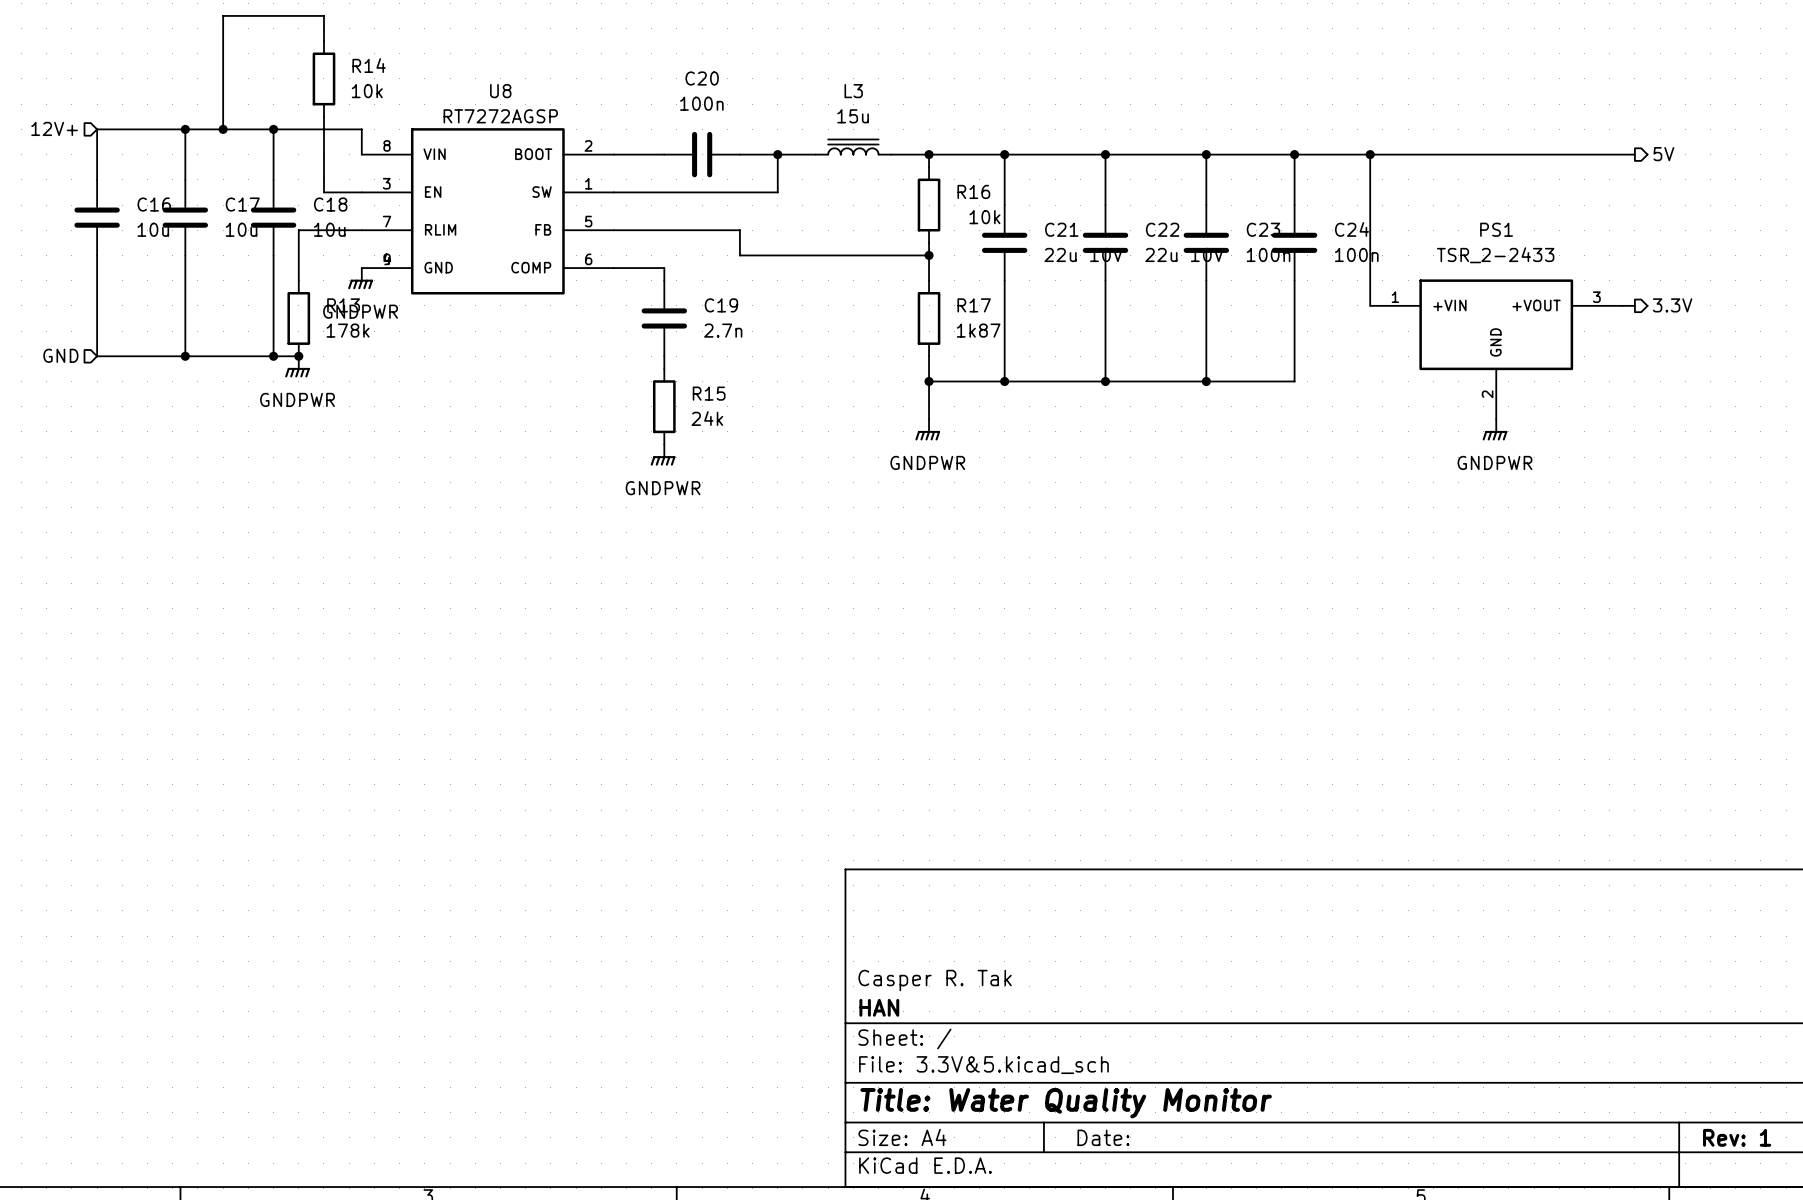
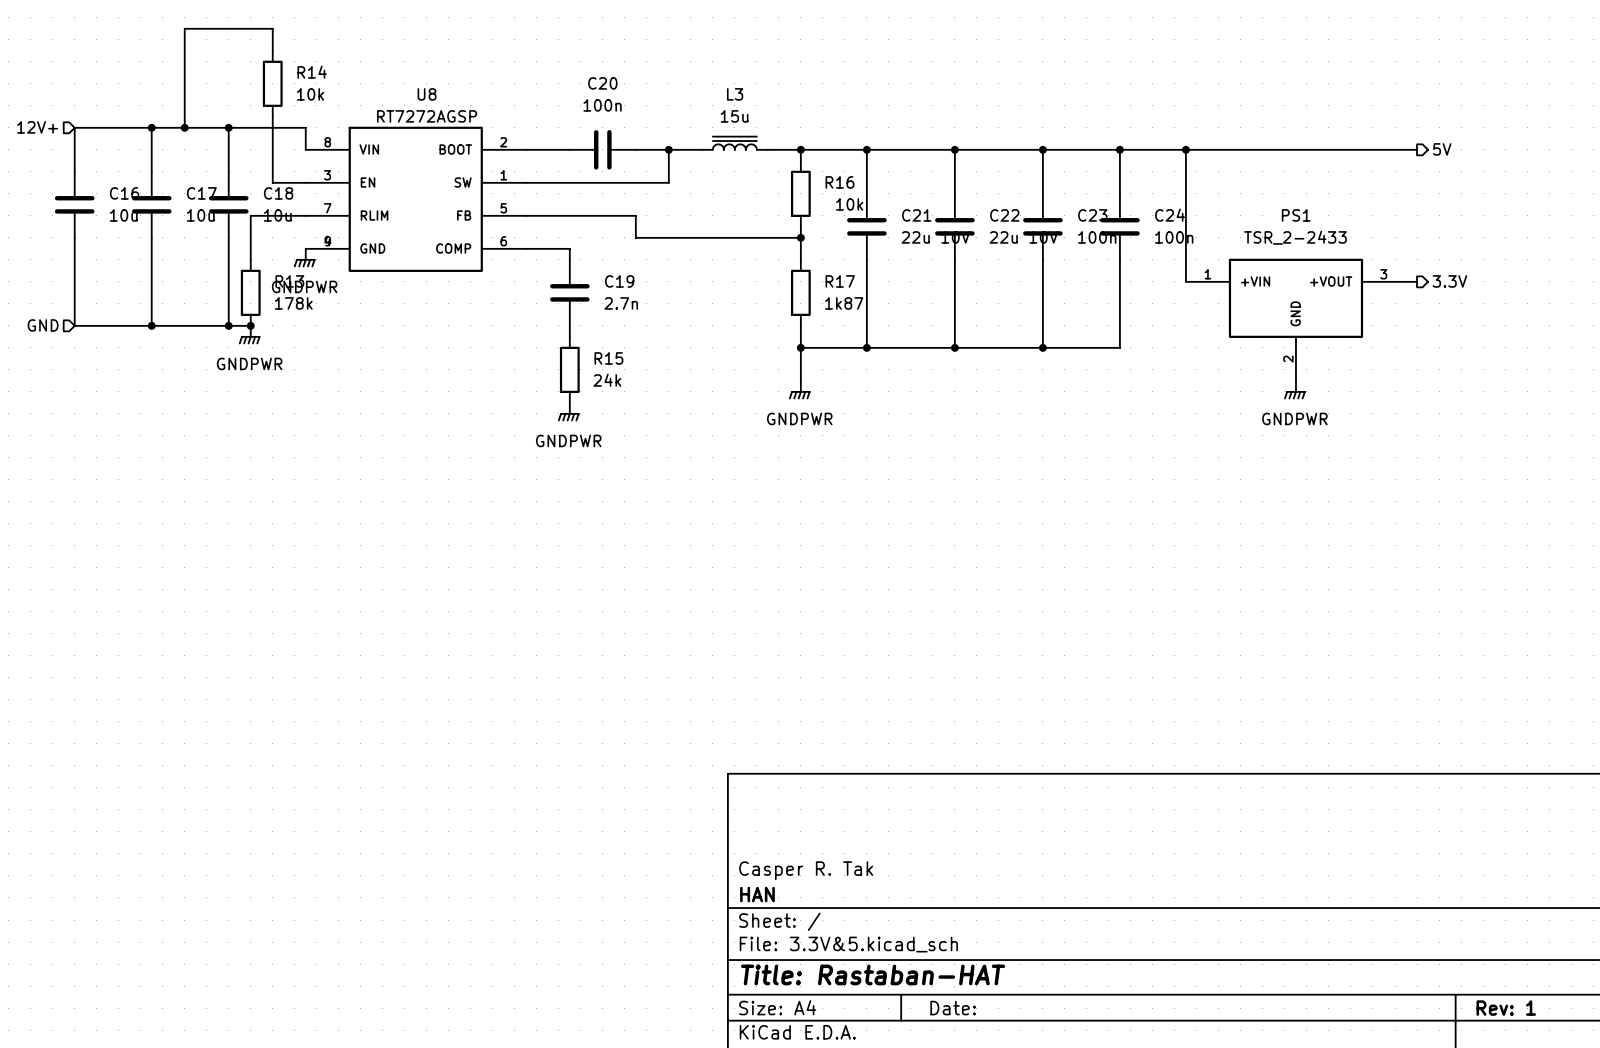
title block: Title: Water Quality Monitor (1066, 1103) -> Title: Rastaban-HAT (873, 974)

